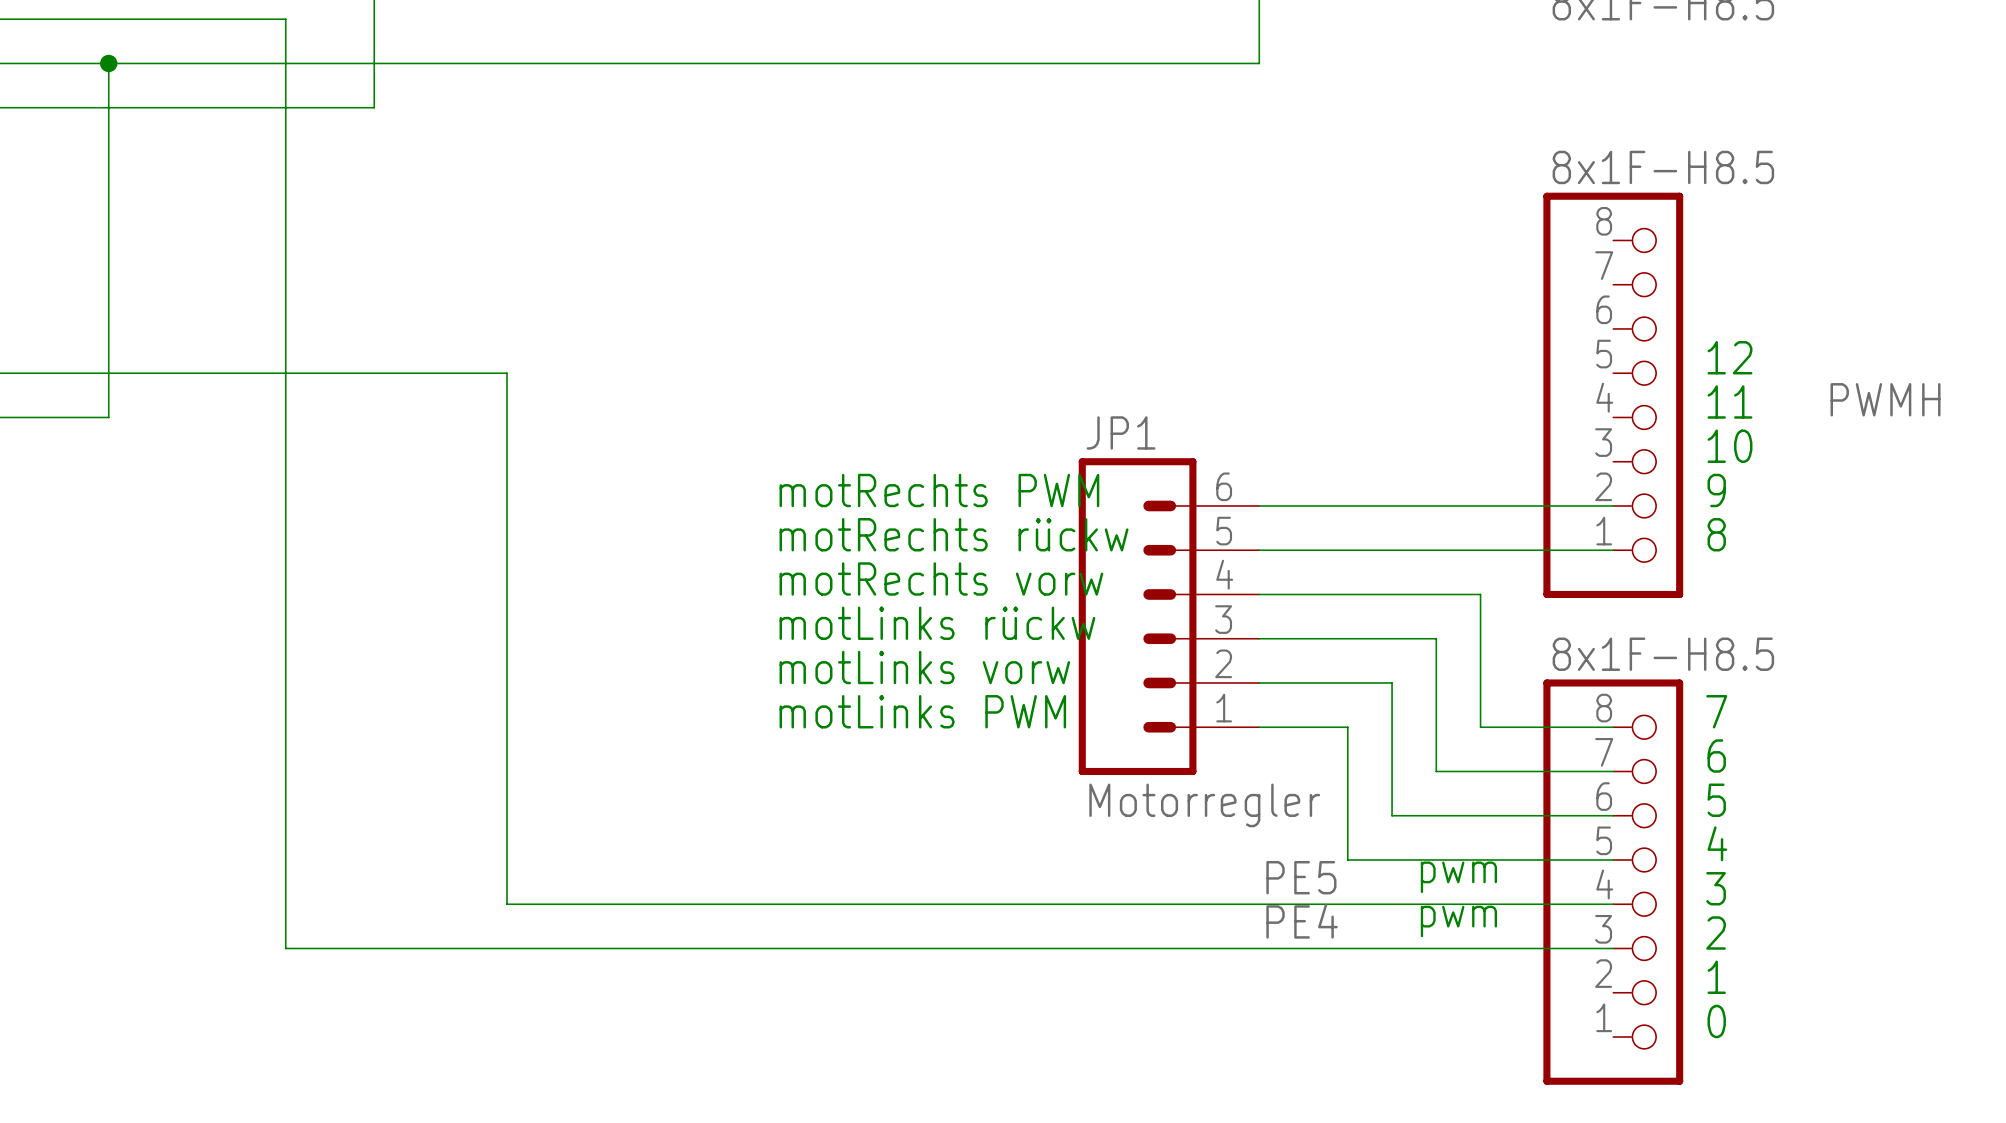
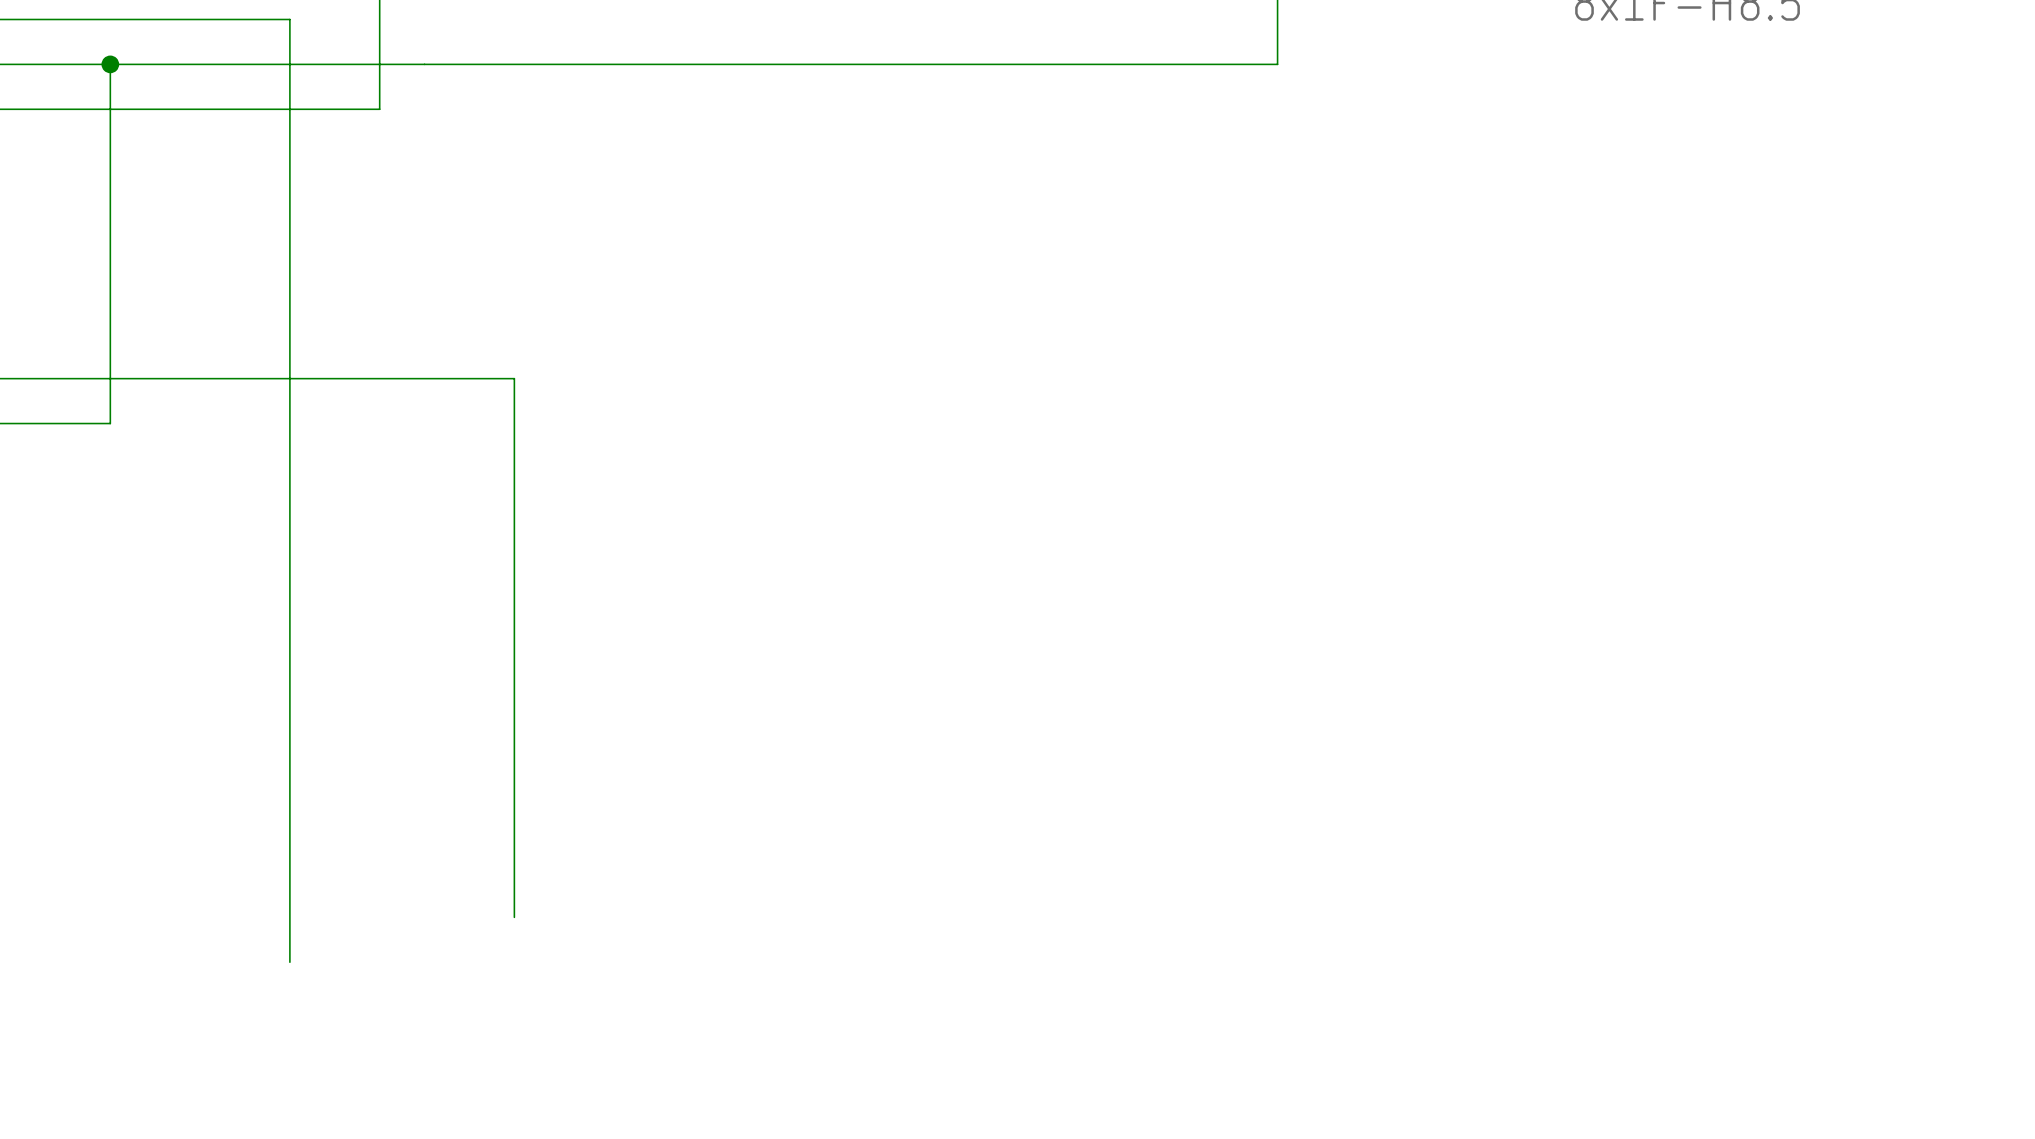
text: 12 (1729, 357) -> none
PWMH: 8x1F-H8.5 (1613, 395) -> none
text: 11 (1729, 401) -> none
text: 10 (1729, 446) -> none
text: motRechts PWM (939, 490) -> none
text: 9 (1716, 490) -> none
wire: (1259, 505) (1613, 505) -> none
text: motRechts rückw (954, 534) -> none
text: 8 (1716, 534) -> none
wire: (1259, 550) (1613, 550) -> none
text: motRechts vorw (941, 578) -> none
wire: (1259, 594) (1480, 594) (1480, 727) (1613, 727) -> none
JP1: Motorregler (1169, 616) -> none
text: motLinks rückw (937, 623) -> none
wire: (1259, 638) (1436, 638) (1436, 771) (1613, 771) -> none
text: motLinks vorw (924, 667) -> none
wire: (1259, 682) (1392, 682) (1392, 815) (1613, 815) -> none
text: motLinks PWM (922, 711) -> none
text: 7 (1716, 711) -> none
wire: (1259, 727) (1347, 727) (1347, 859) (1613, 859) -> none
text: 6 (1716, 756) -> none
text: 5 (1716, 800) -> none
text: 4 (1717, 843) -> none
label: PE5 (1301, 877) -> none
text: pwm (1458, 877) -> none
part: 8x1F-H8.5 (1613, 882) -> none
text: 3 (1716, 888) -> none
wire: (507, 904) (1613, 904) -> none
label: PE4 (1302, 921) -> none
text: pwm (1458, 921) -> none
text: 2 (1716, 933) -> none
wire: (285, 948) (1613, 948) -> none
text: 1 (1716, 977) -> none
text: 0 (1716, 1021) -> none

